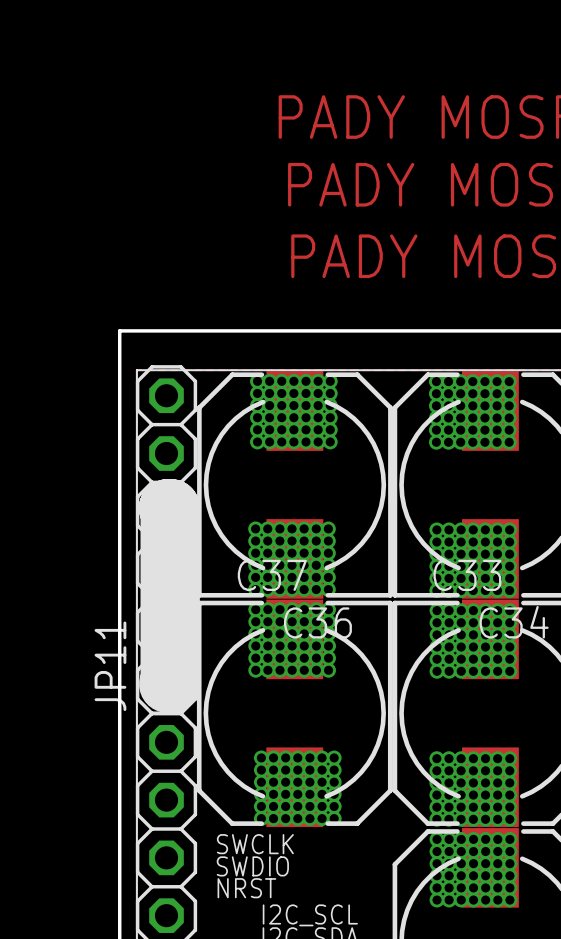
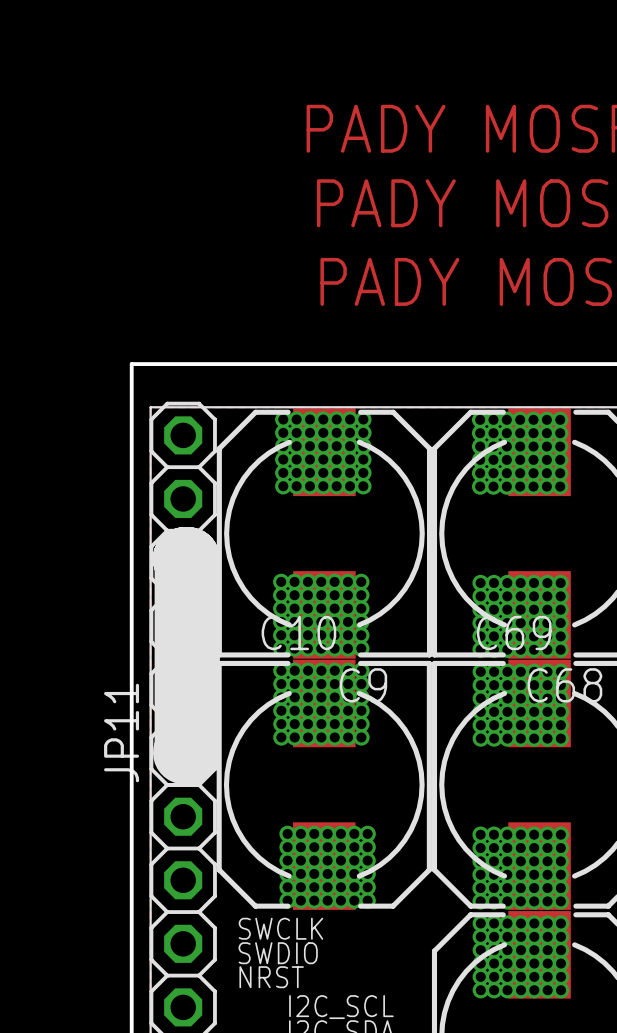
C37 name: C37 (272, 575) -> C10 (298, 633)
C33 name: C33 (467, 575) -> C69 (514, 633)
C36 name: C36 (317, 622) -> C9 (363, 685)
C34 name: C34 (514, 622) -> C68 (564, 685)

